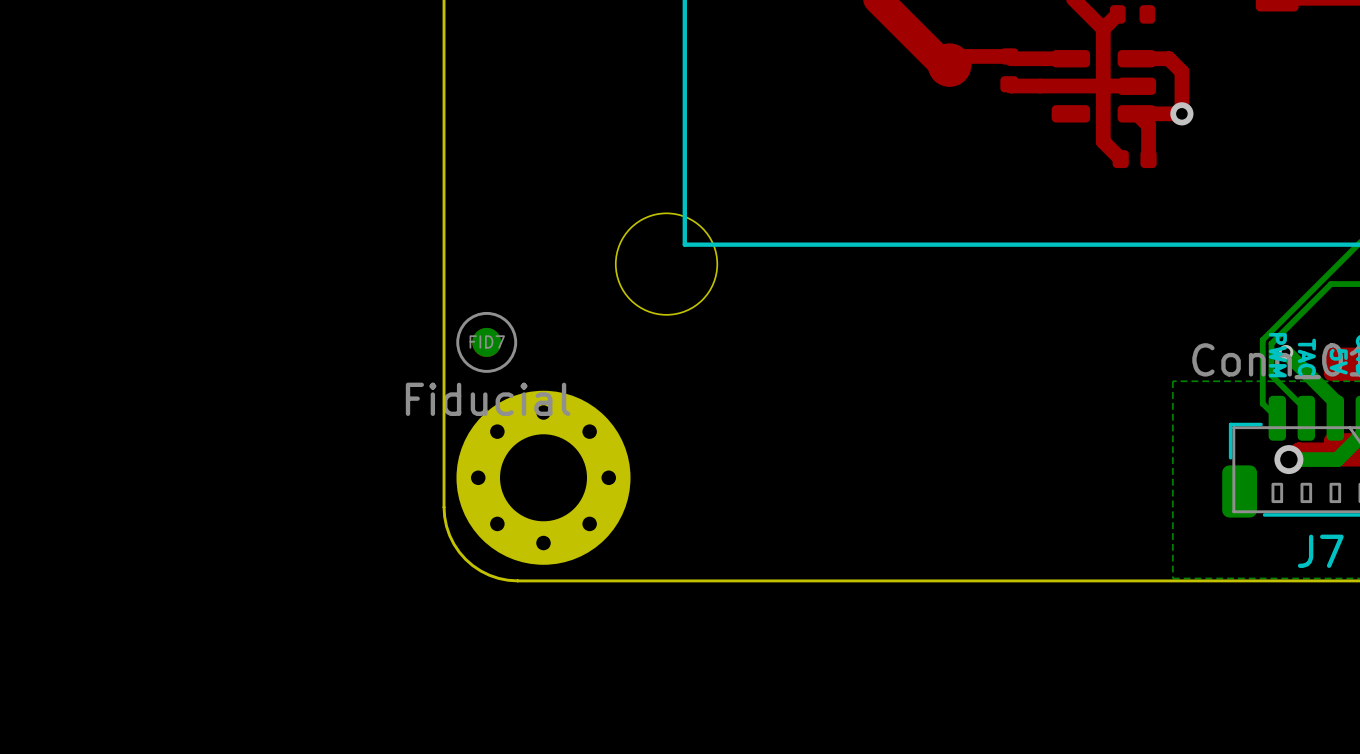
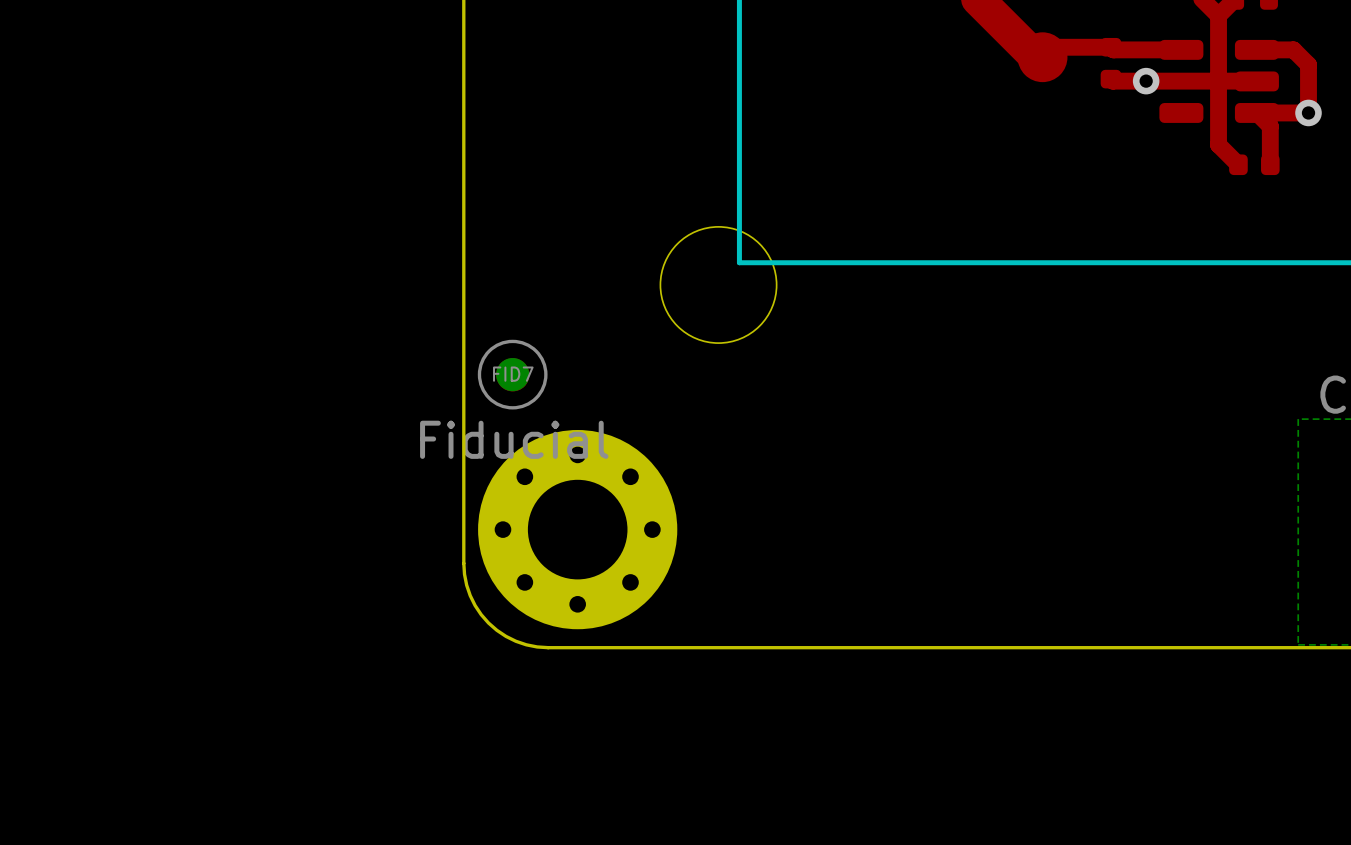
via: none -> (1146, 81)

